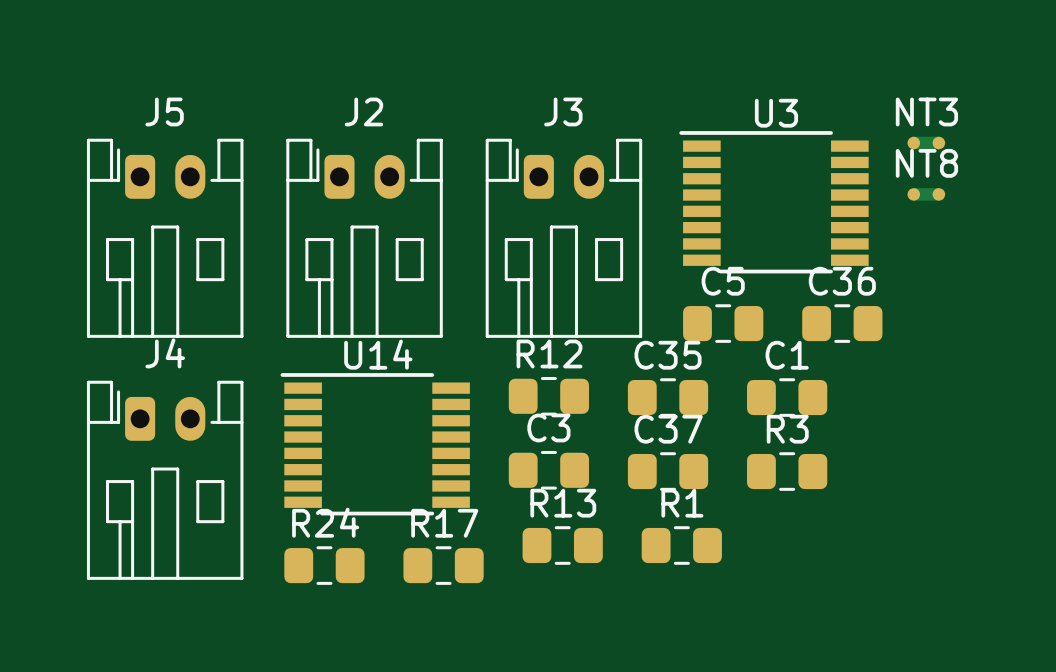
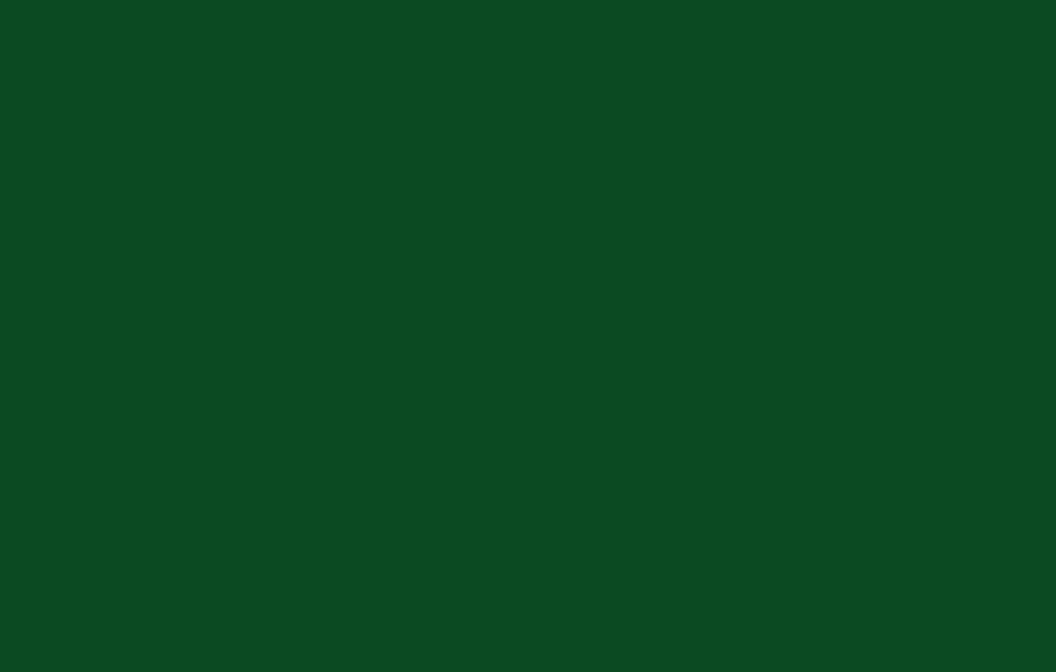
NT3: (926, 143) -> none
NT8: (926, 194) -> none
U3: (773, 202) -> none
J5: (165, 238) -> none
J2: (364, 238) -> none
J3: (563, 238) -> none
C5: (723, 323) -> none
C36: (842, 323) -> none
R12: (548, 396) -> none
C35: (668, 397) -> none
C1: (787, 397) -> none
U14: (375, 444) -> none
C3: (548, 470) -> none
C37: (668, 471) -> none
R3: (787, 471) -> none
J4: (165, 480) -> none
R13: (562, 545) -> none
R1: (681, 545) -> none
R24: (324, 565) -> none
R17: (443, 565) -> none

